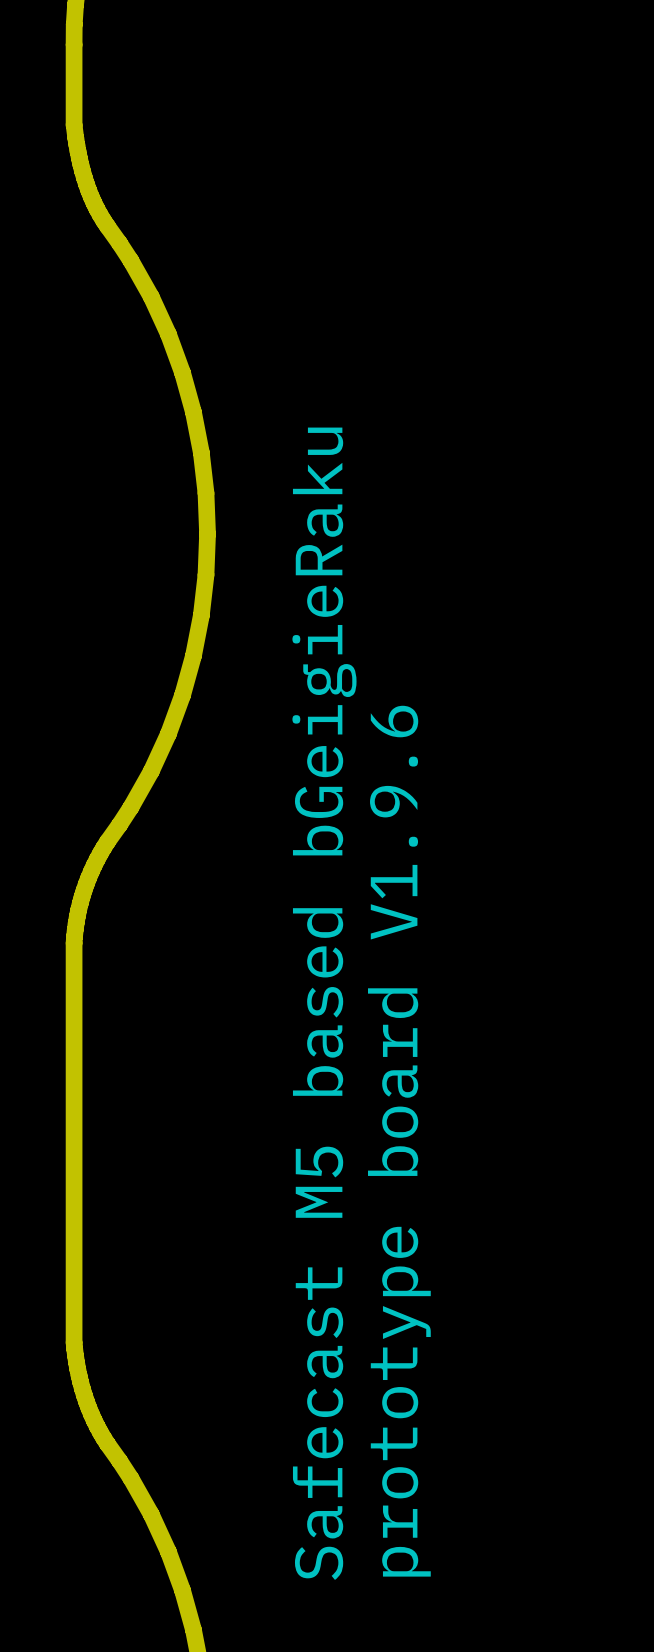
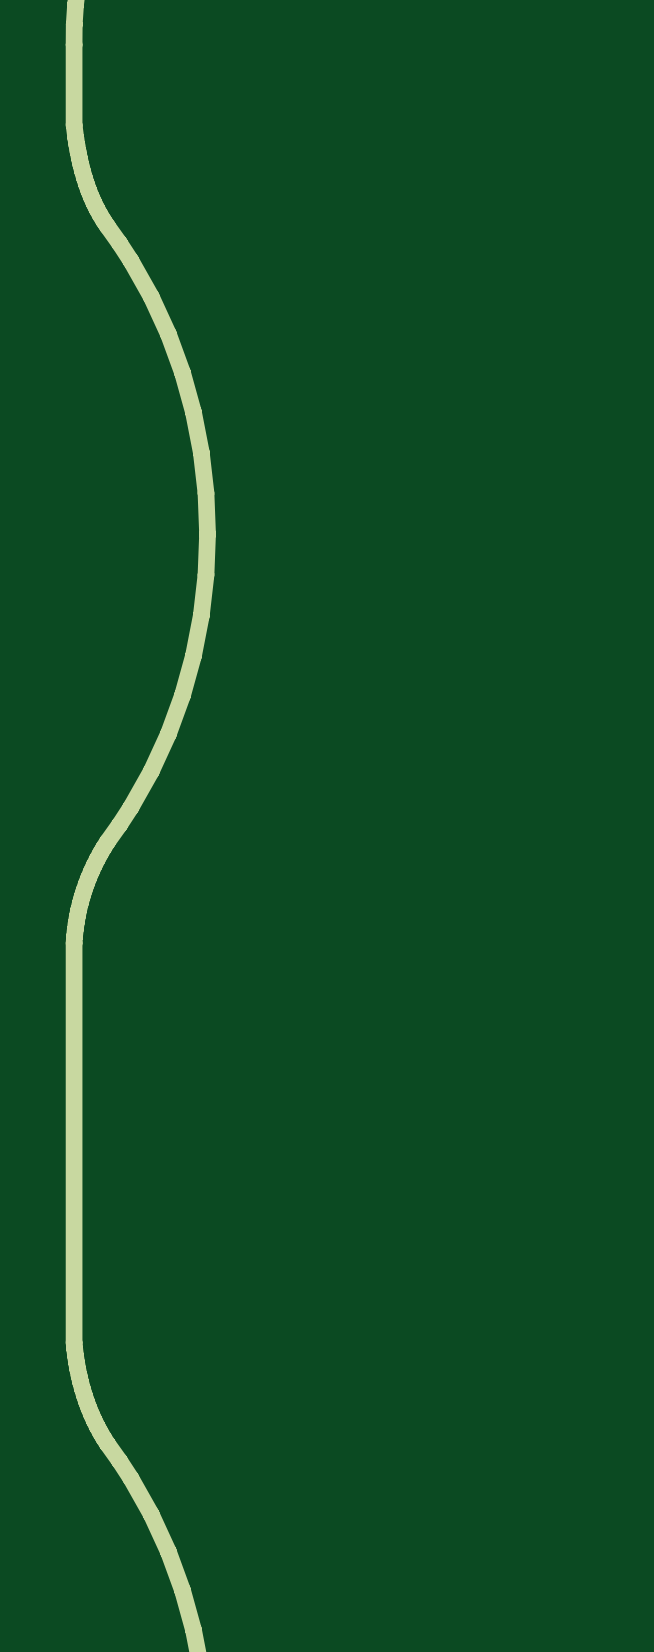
text: Safecast M5 based bGeigieRaku (324, 1003) -> none
text: prototype board V1.9.6 (399, 1141) -> none

